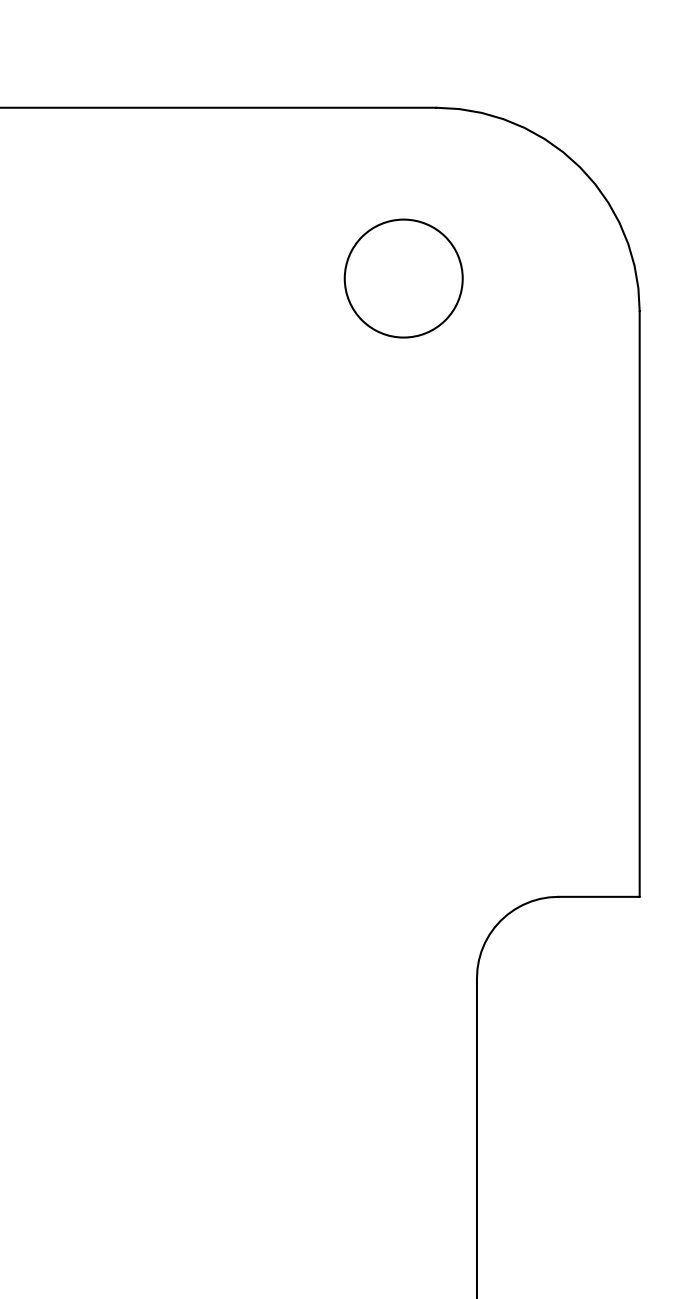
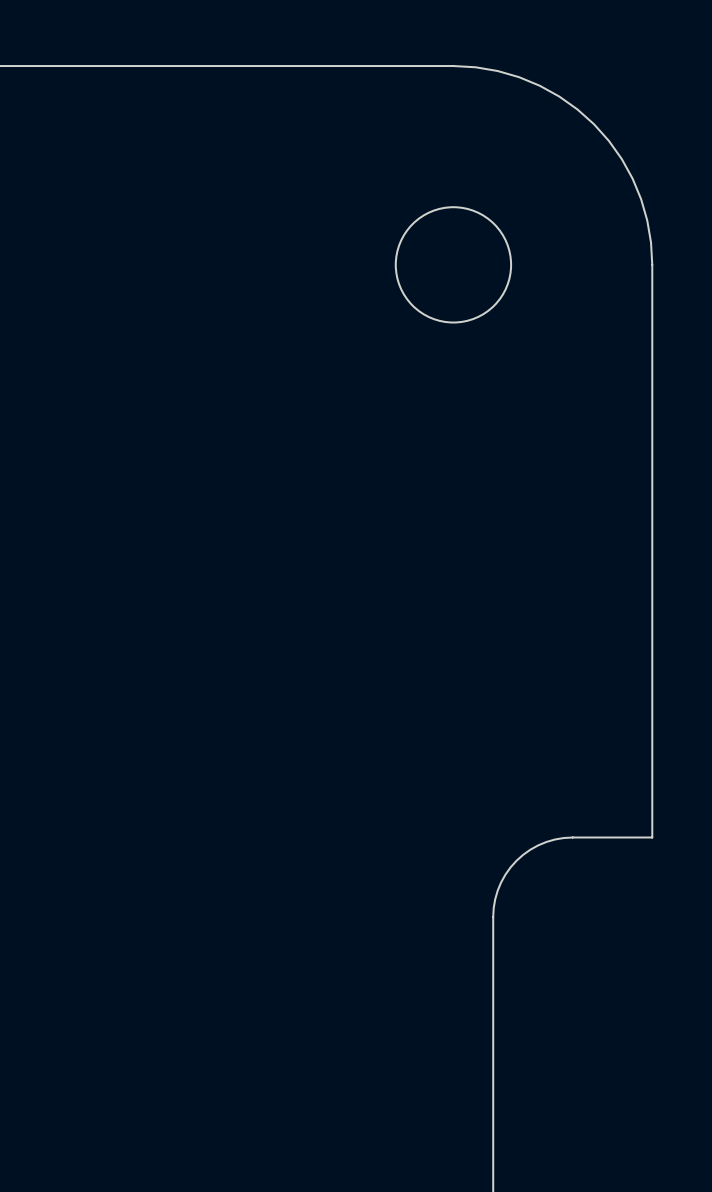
round board edge position: (403, 278) -> (453, 264)

